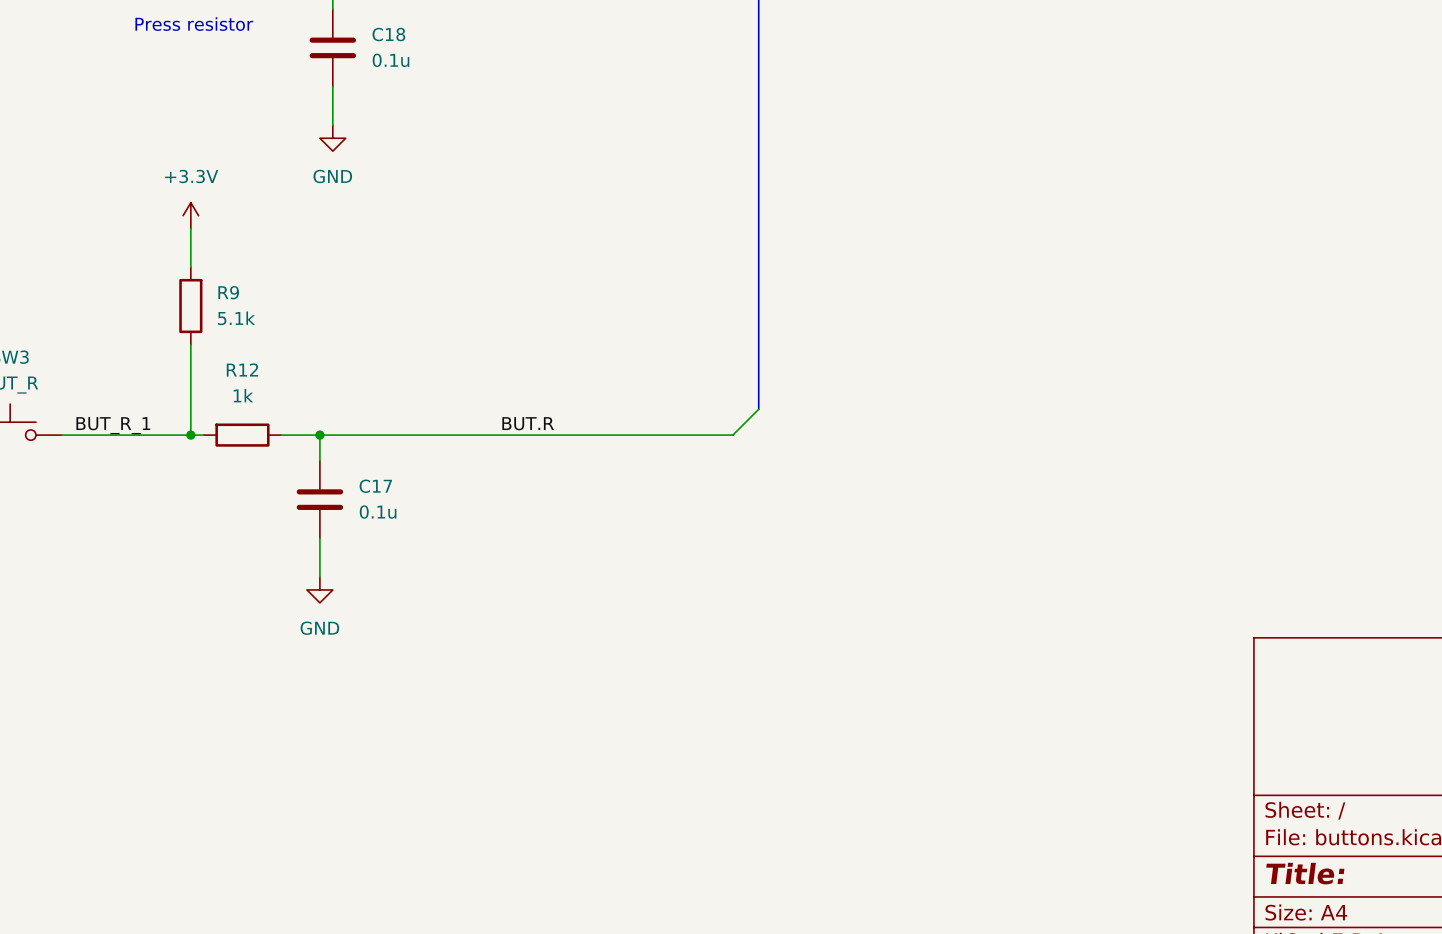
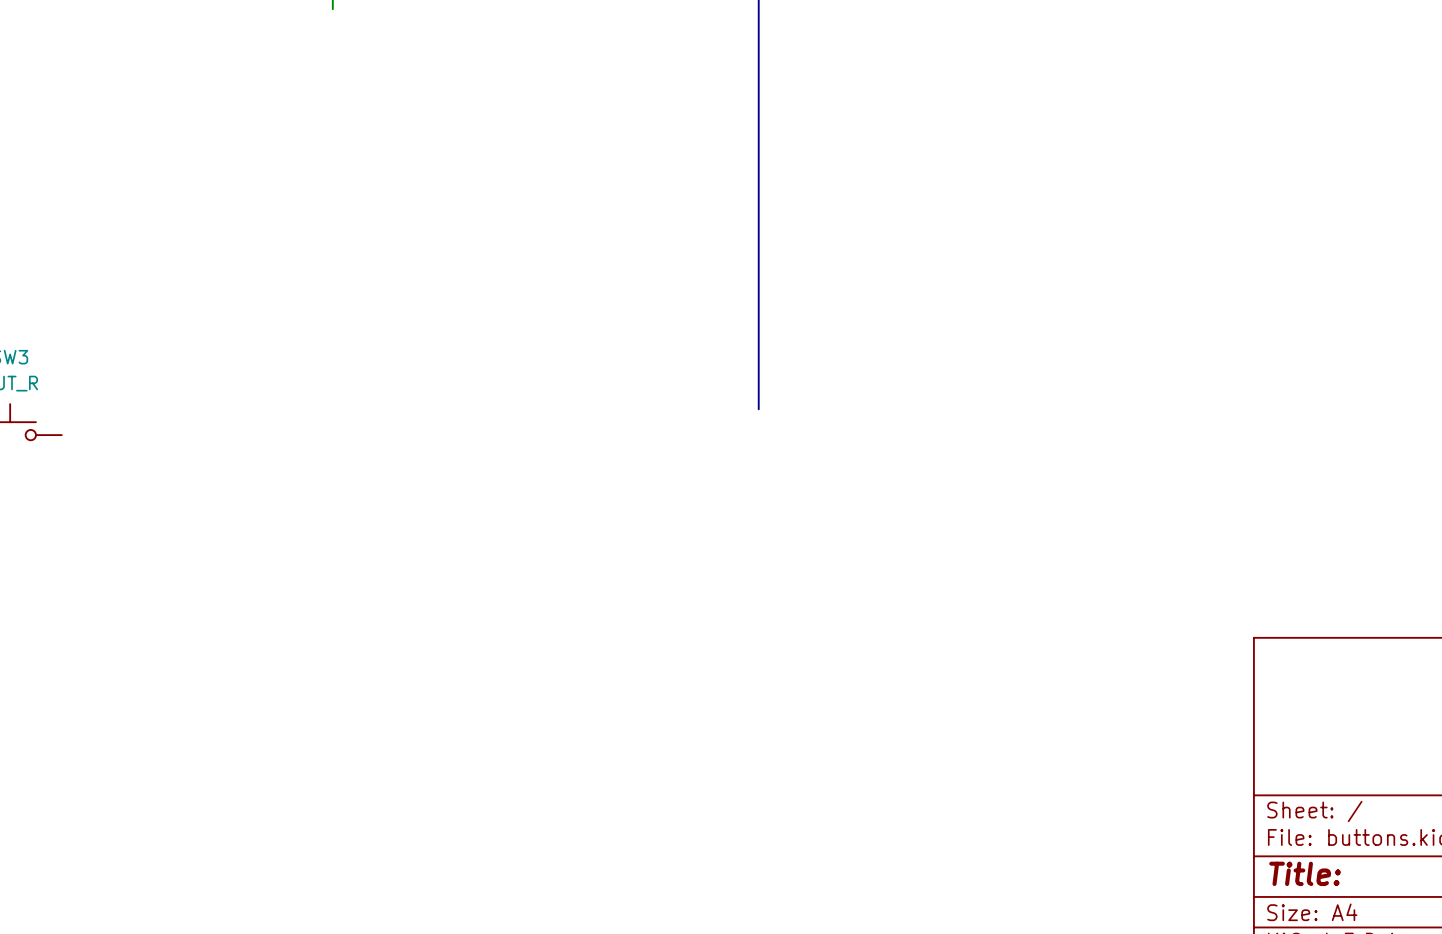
text: Press resistor (194, 24) -> none
C18: 0.1u (332, 47) -> none
wire: (332, 86) (332, 125) -> none
power symbol: GND (332, 138) -> none
power symbol: +3.3V (190, 215) -> none
wire: (190, 228) (190, 267) -> none
R9: 5.1k (190, 306) -> none
wire: (190, 344) (190, 435) -> none
wire: (758, 409) (732, 435) (281, 435) -> none
label: BUT.R (528, 423) -> none
label: BUT_R_1 (113, 425) -> none
wire: (61, 435) (203, 435) -> none
junction: (190, 435) -> none
R12: 1k (242, 435) -> none
wire: (319, 435) (319, 460) -> none
junction: (319, 435) -> none
C17: 0.1u (319, 499) -> none
wire: (319, 538) (319, 577) -> none
power symbol: GND (319, 589) -> none

